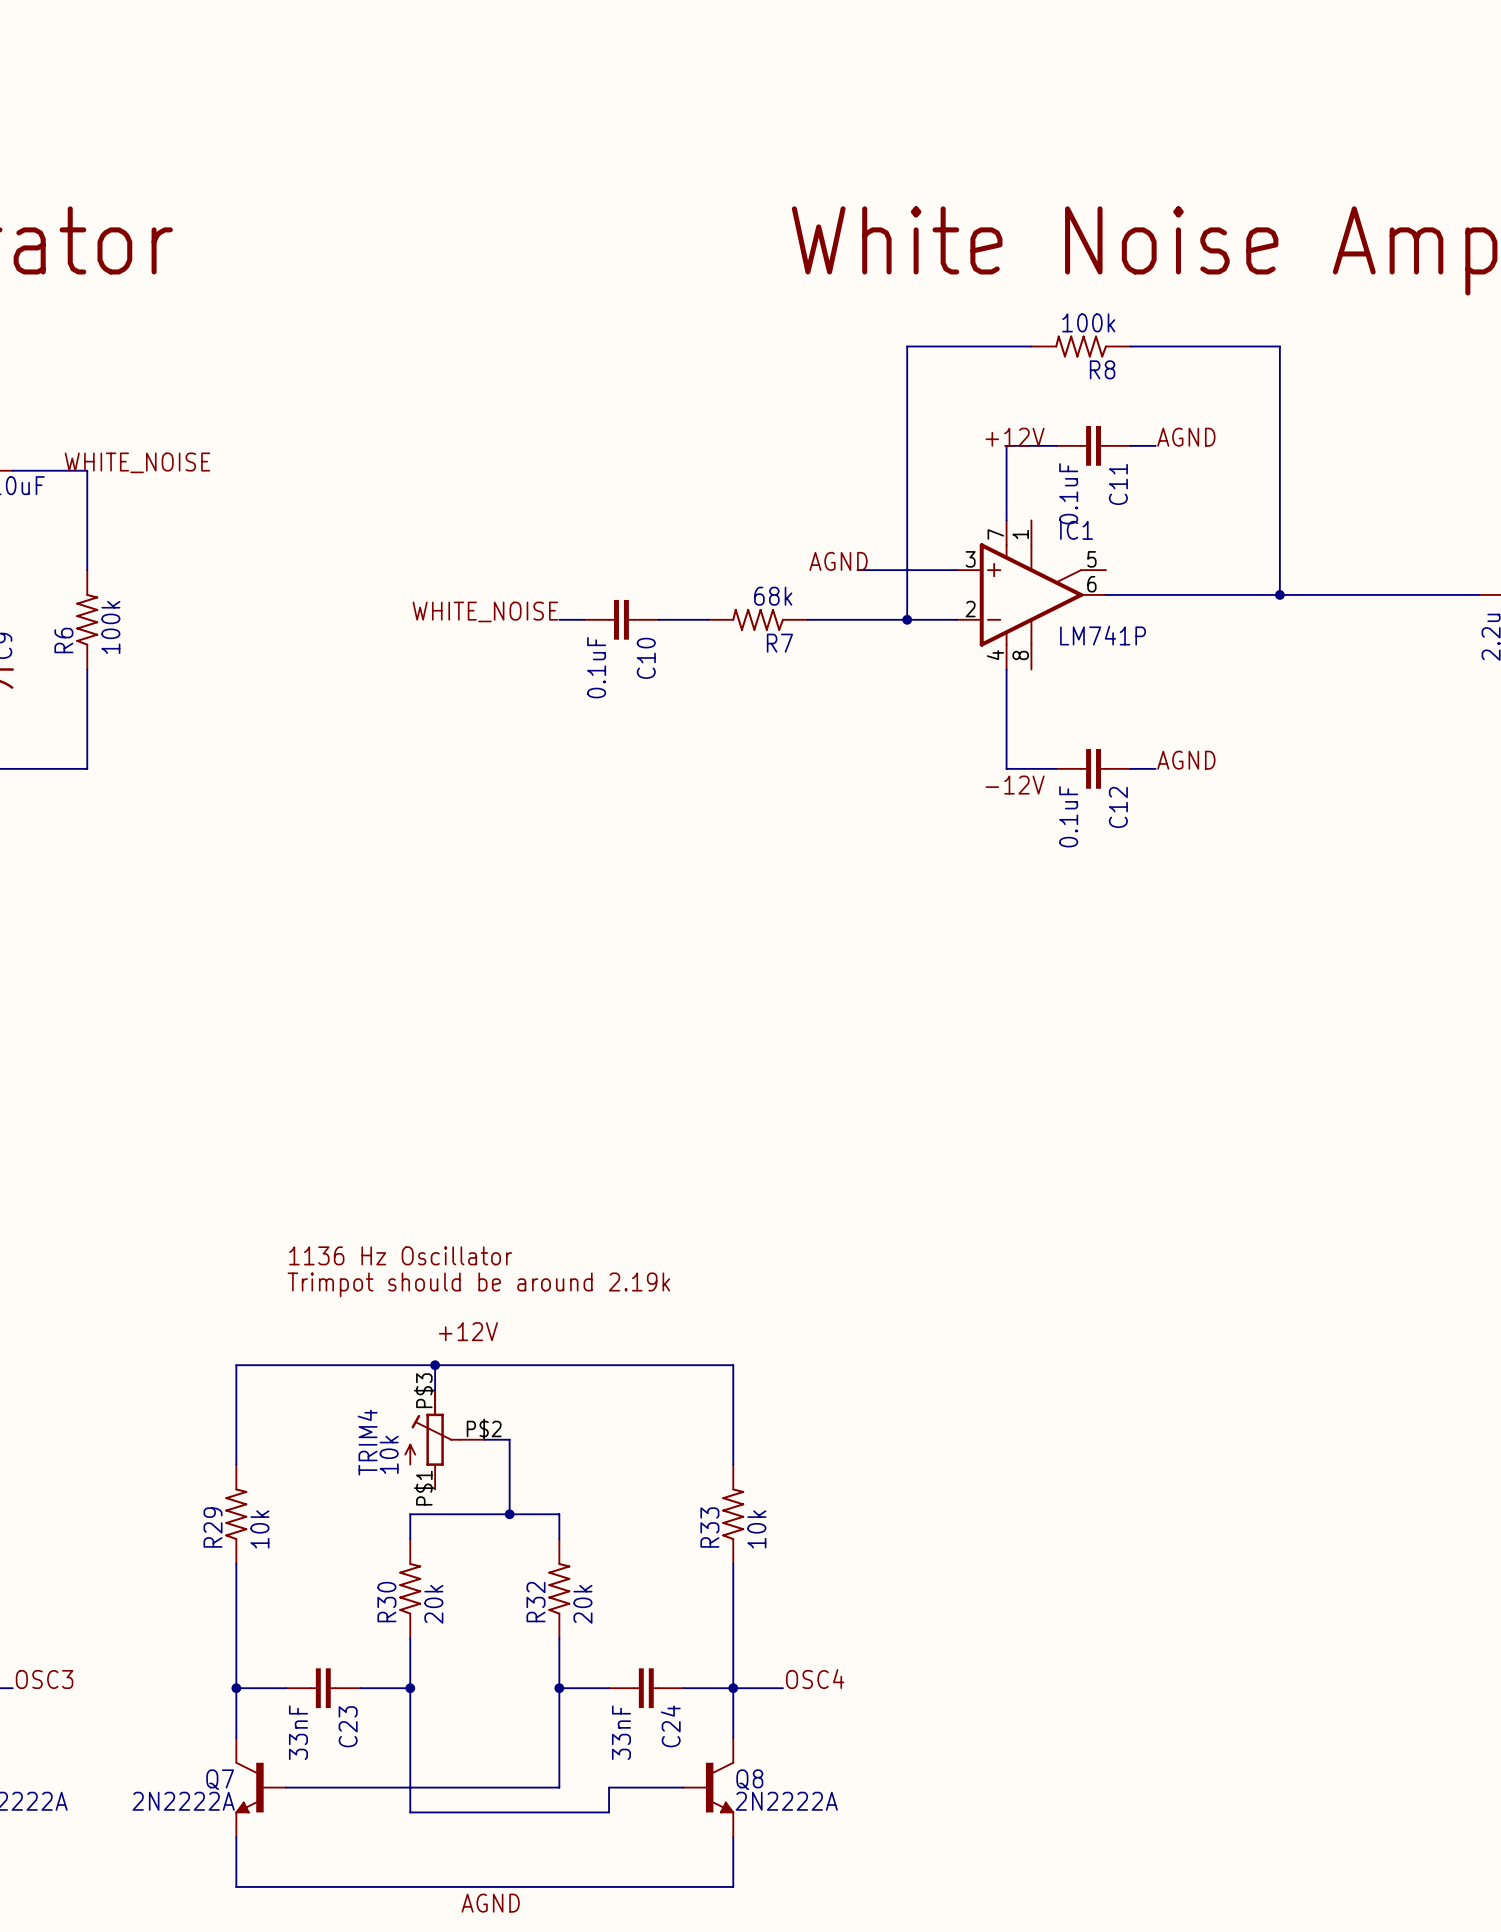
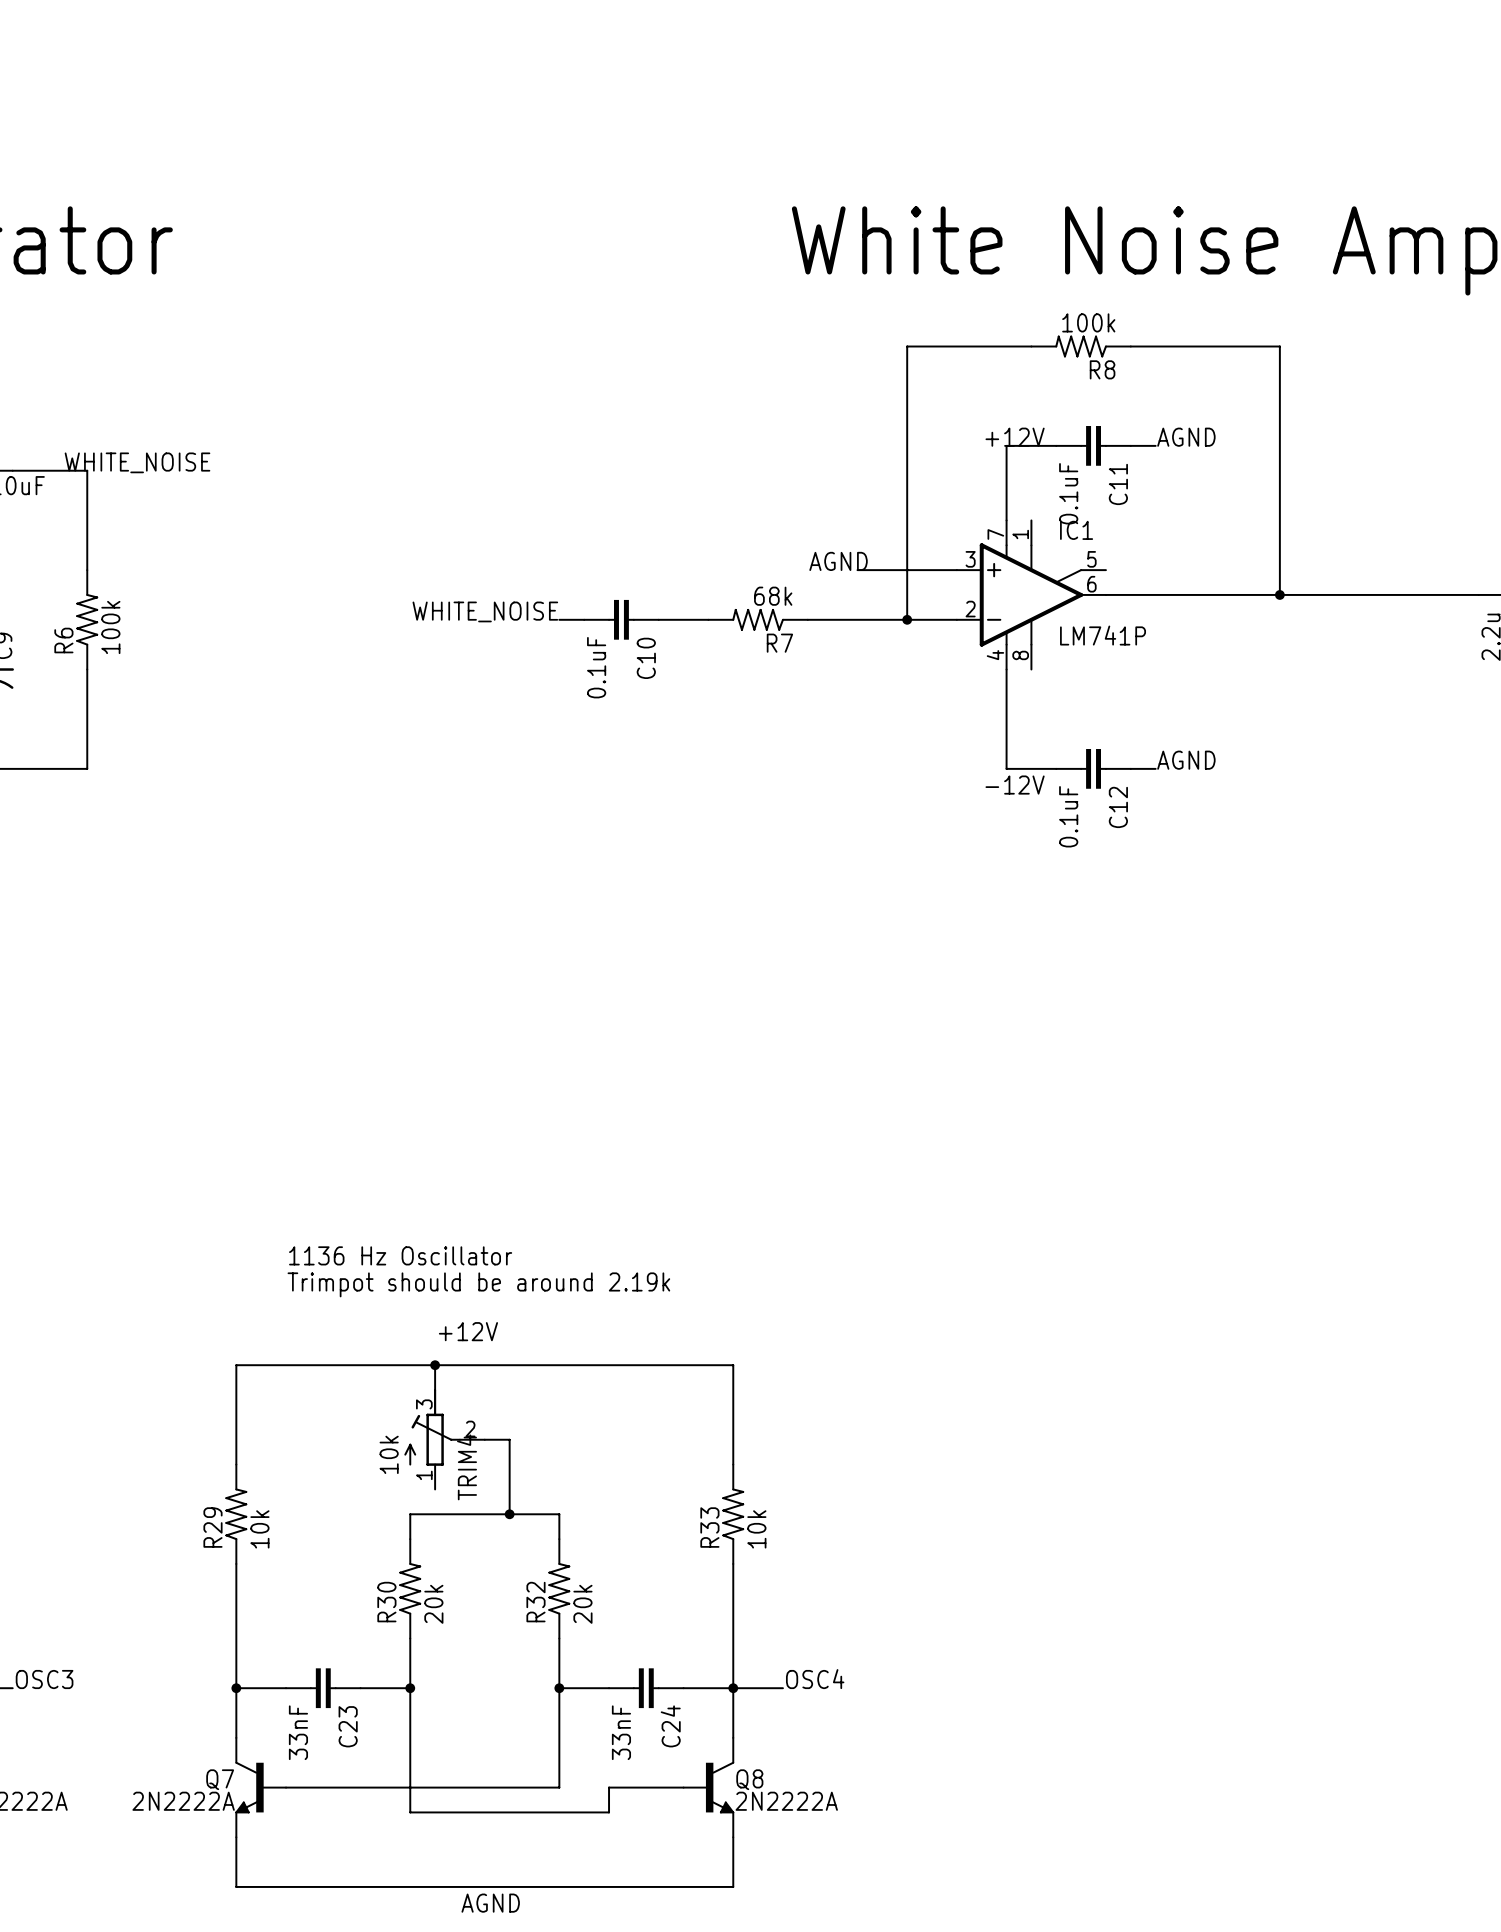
TRIM4 pin number: P$3 (424, 1390) -> 3 (424, 1404)
TRIM4 pin number: P$2 (484, 1428) -> 2 (470, 1428)
TRIM4 name position: TRIM4 (367, 1442) -> TRIM4 (466, 1467)
TRIM4 pin number: P$1 (424, 1488) -> 1 (424, 1475)

